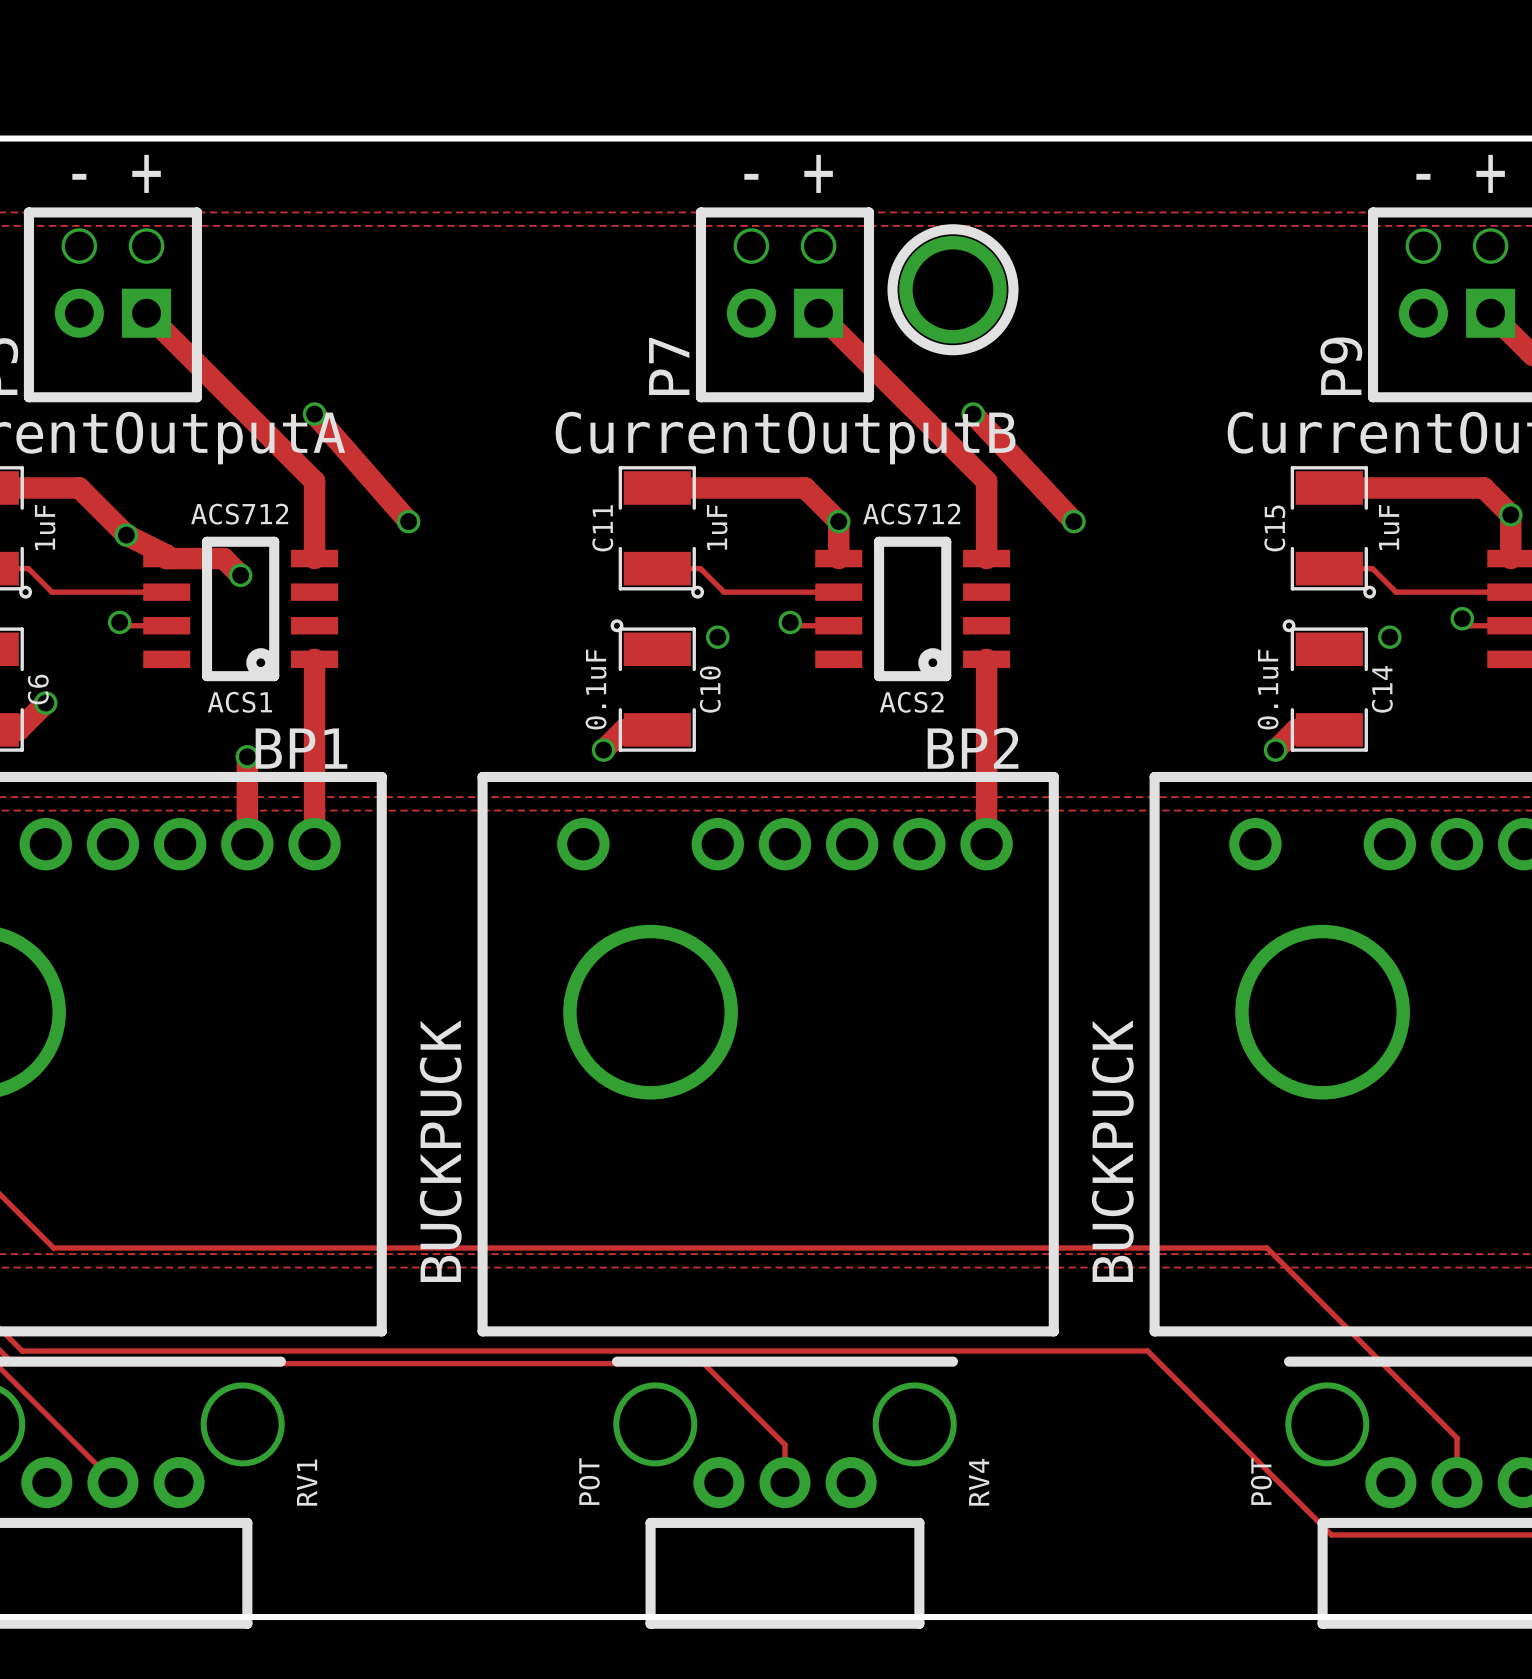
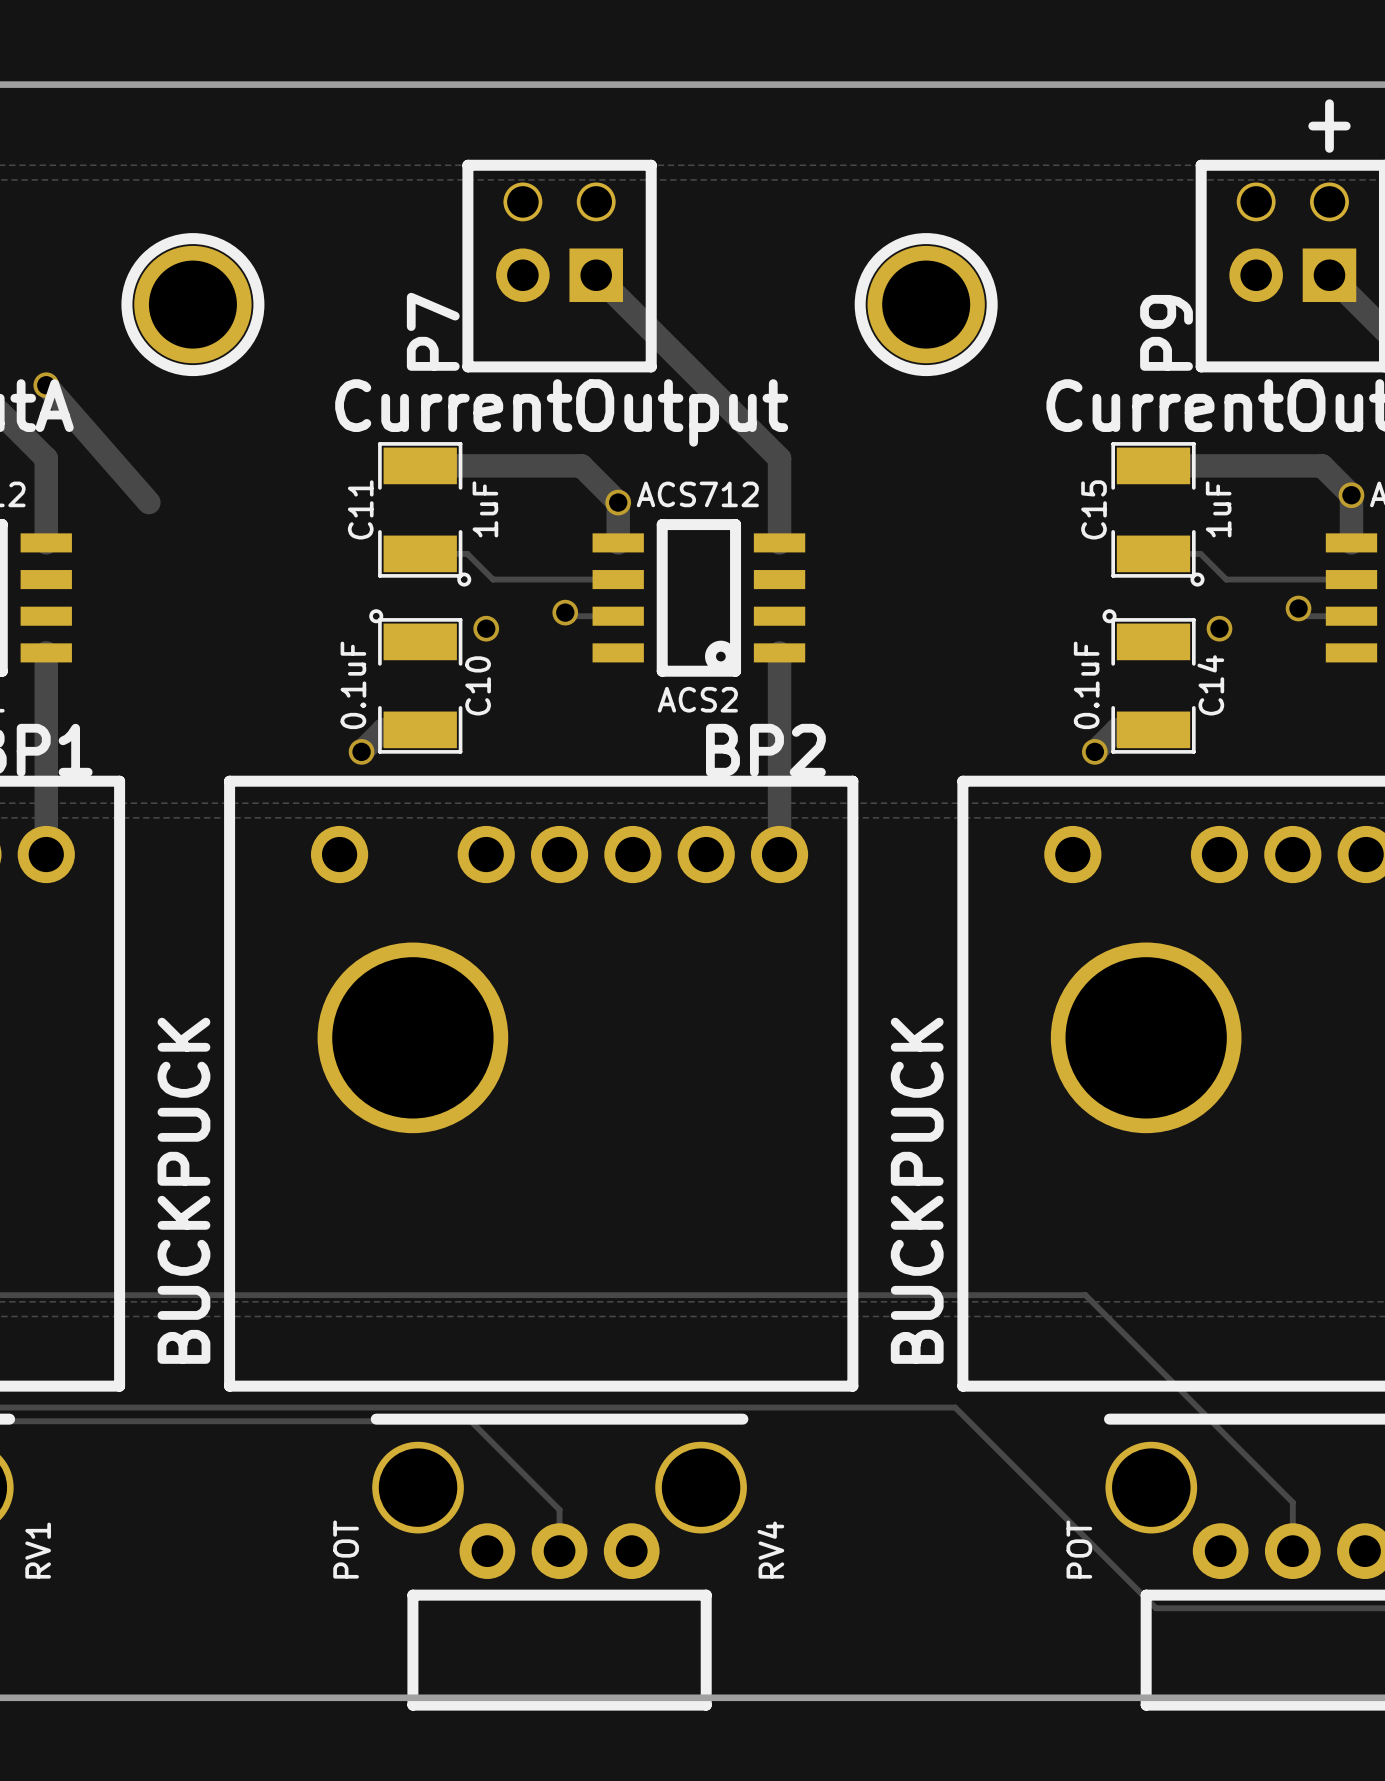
text: + (818, 173) -> none
text: - (751, 176) -> none
text: - (1423, 176) -> none
part position: (952, 289) -> (926, 304)
part: none -> (192, 304)
track: (973, 414) (1073, 521) -> none
via: (973, 414) -> none
P7 value: CurrentOutputB (785, 438) -> CurrentOutput (561, 412)
via: (408, 521) -> none
via: (1073, 521) -> none

